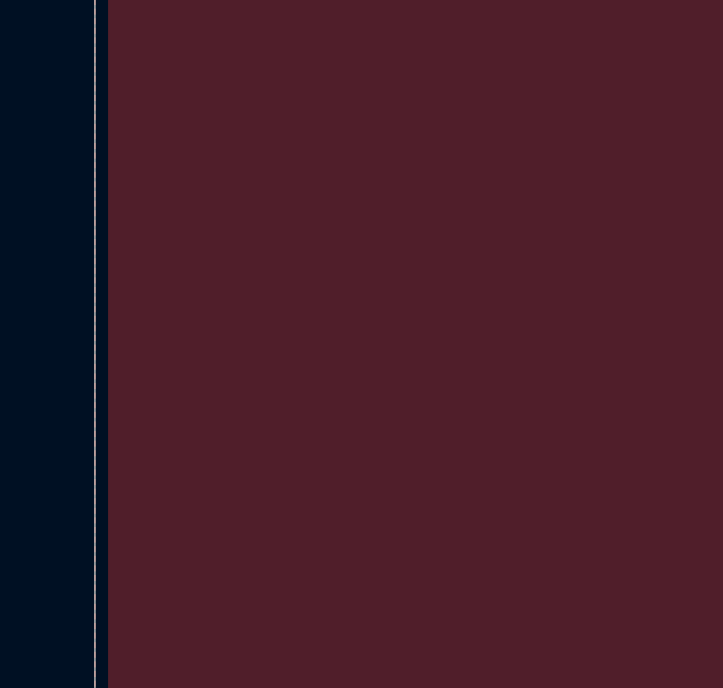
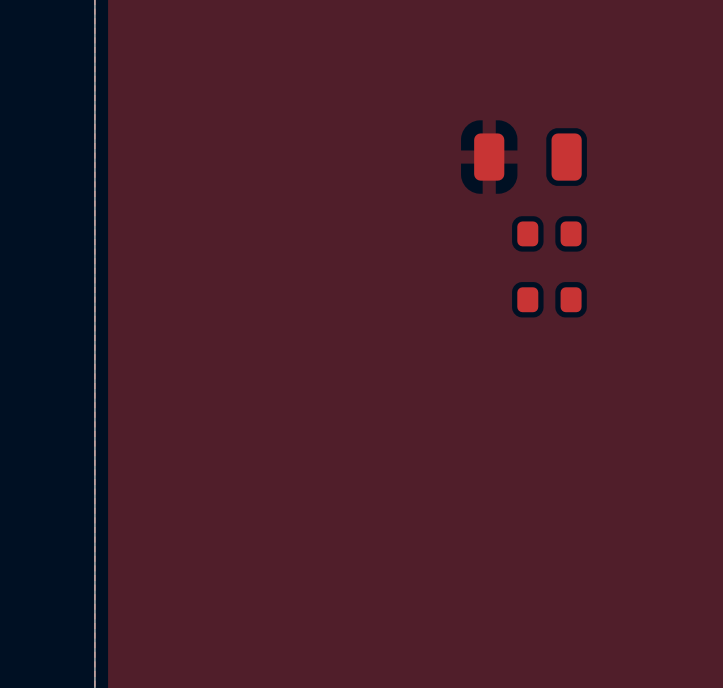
part: none -> (527, 157)
part: none -> (549, 233)
part: none -> (549, 299)

